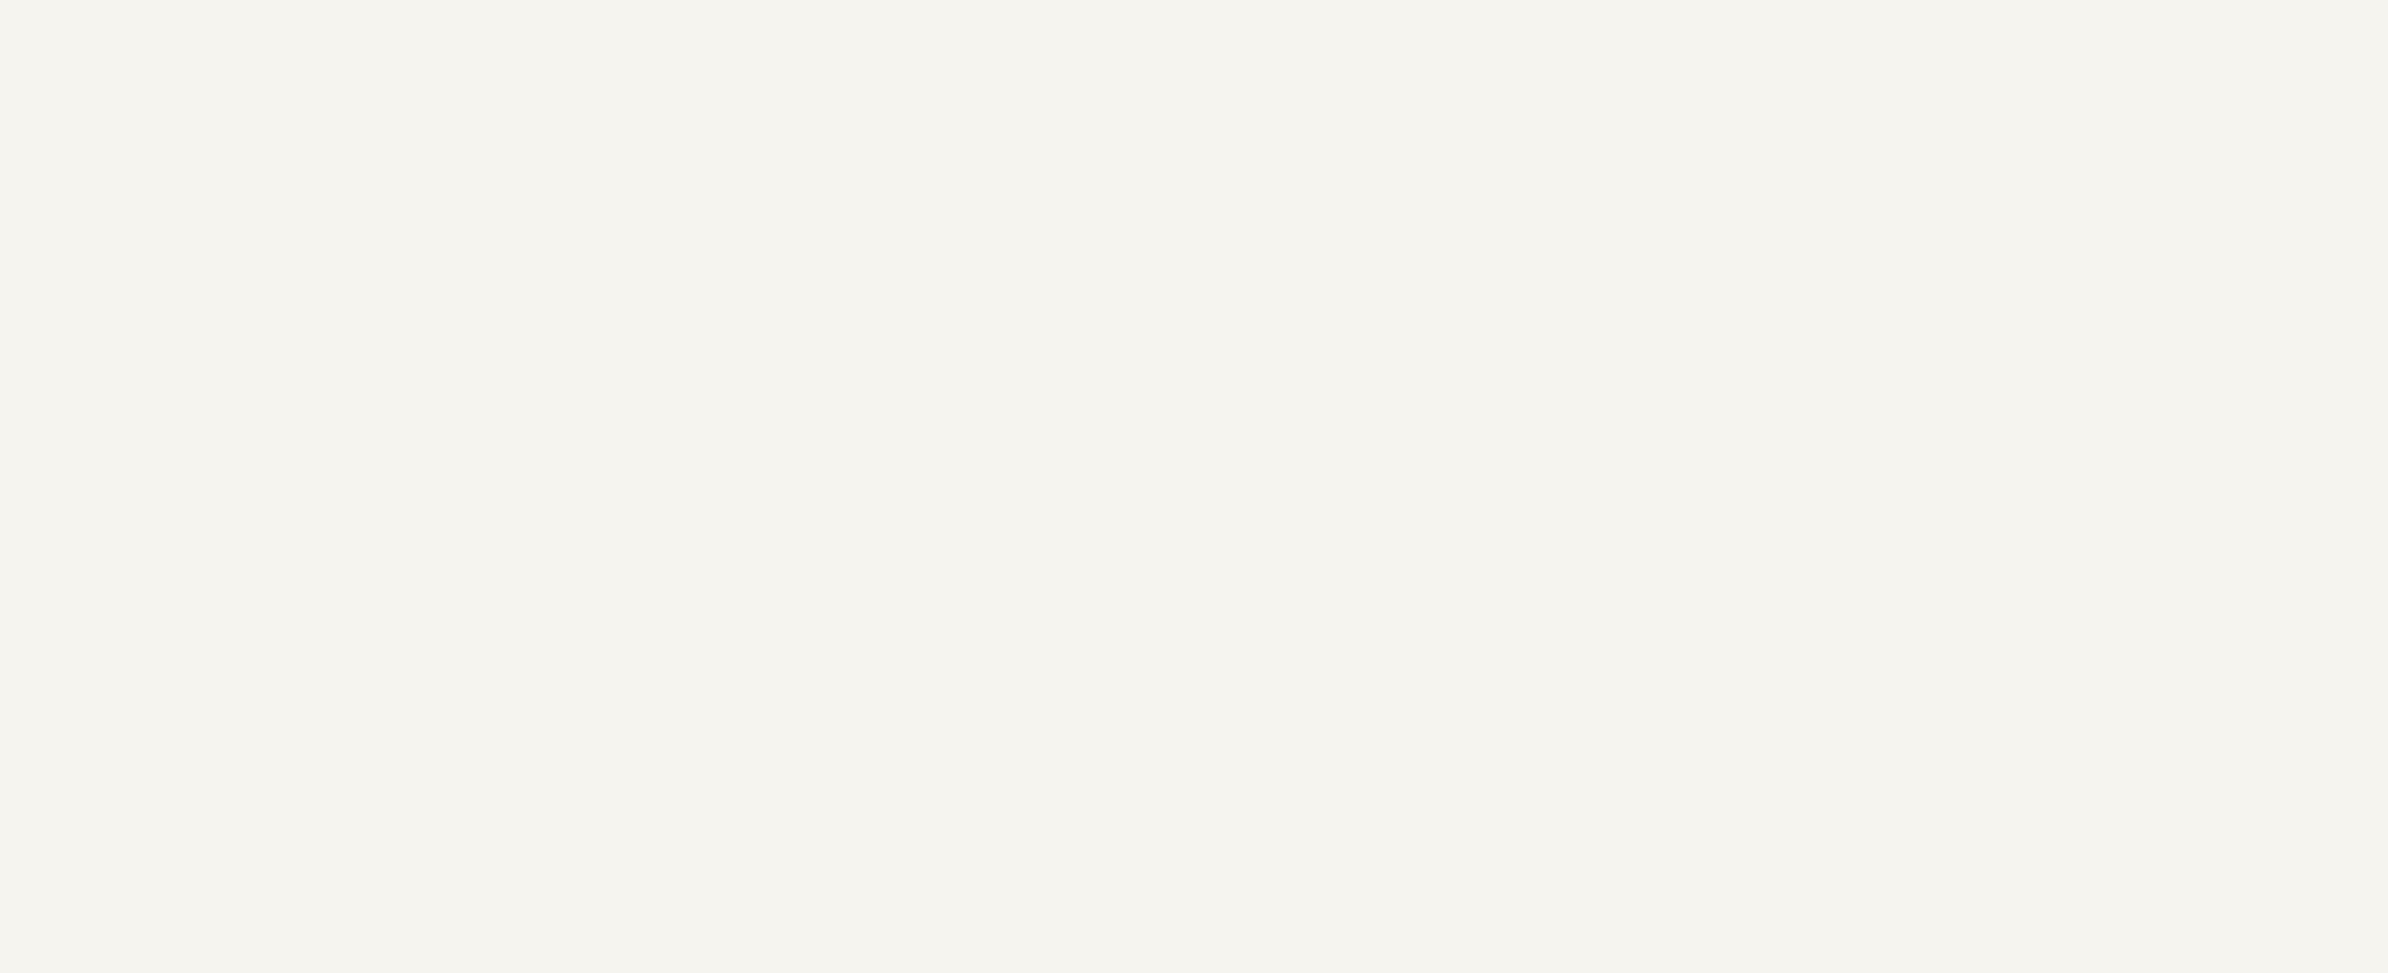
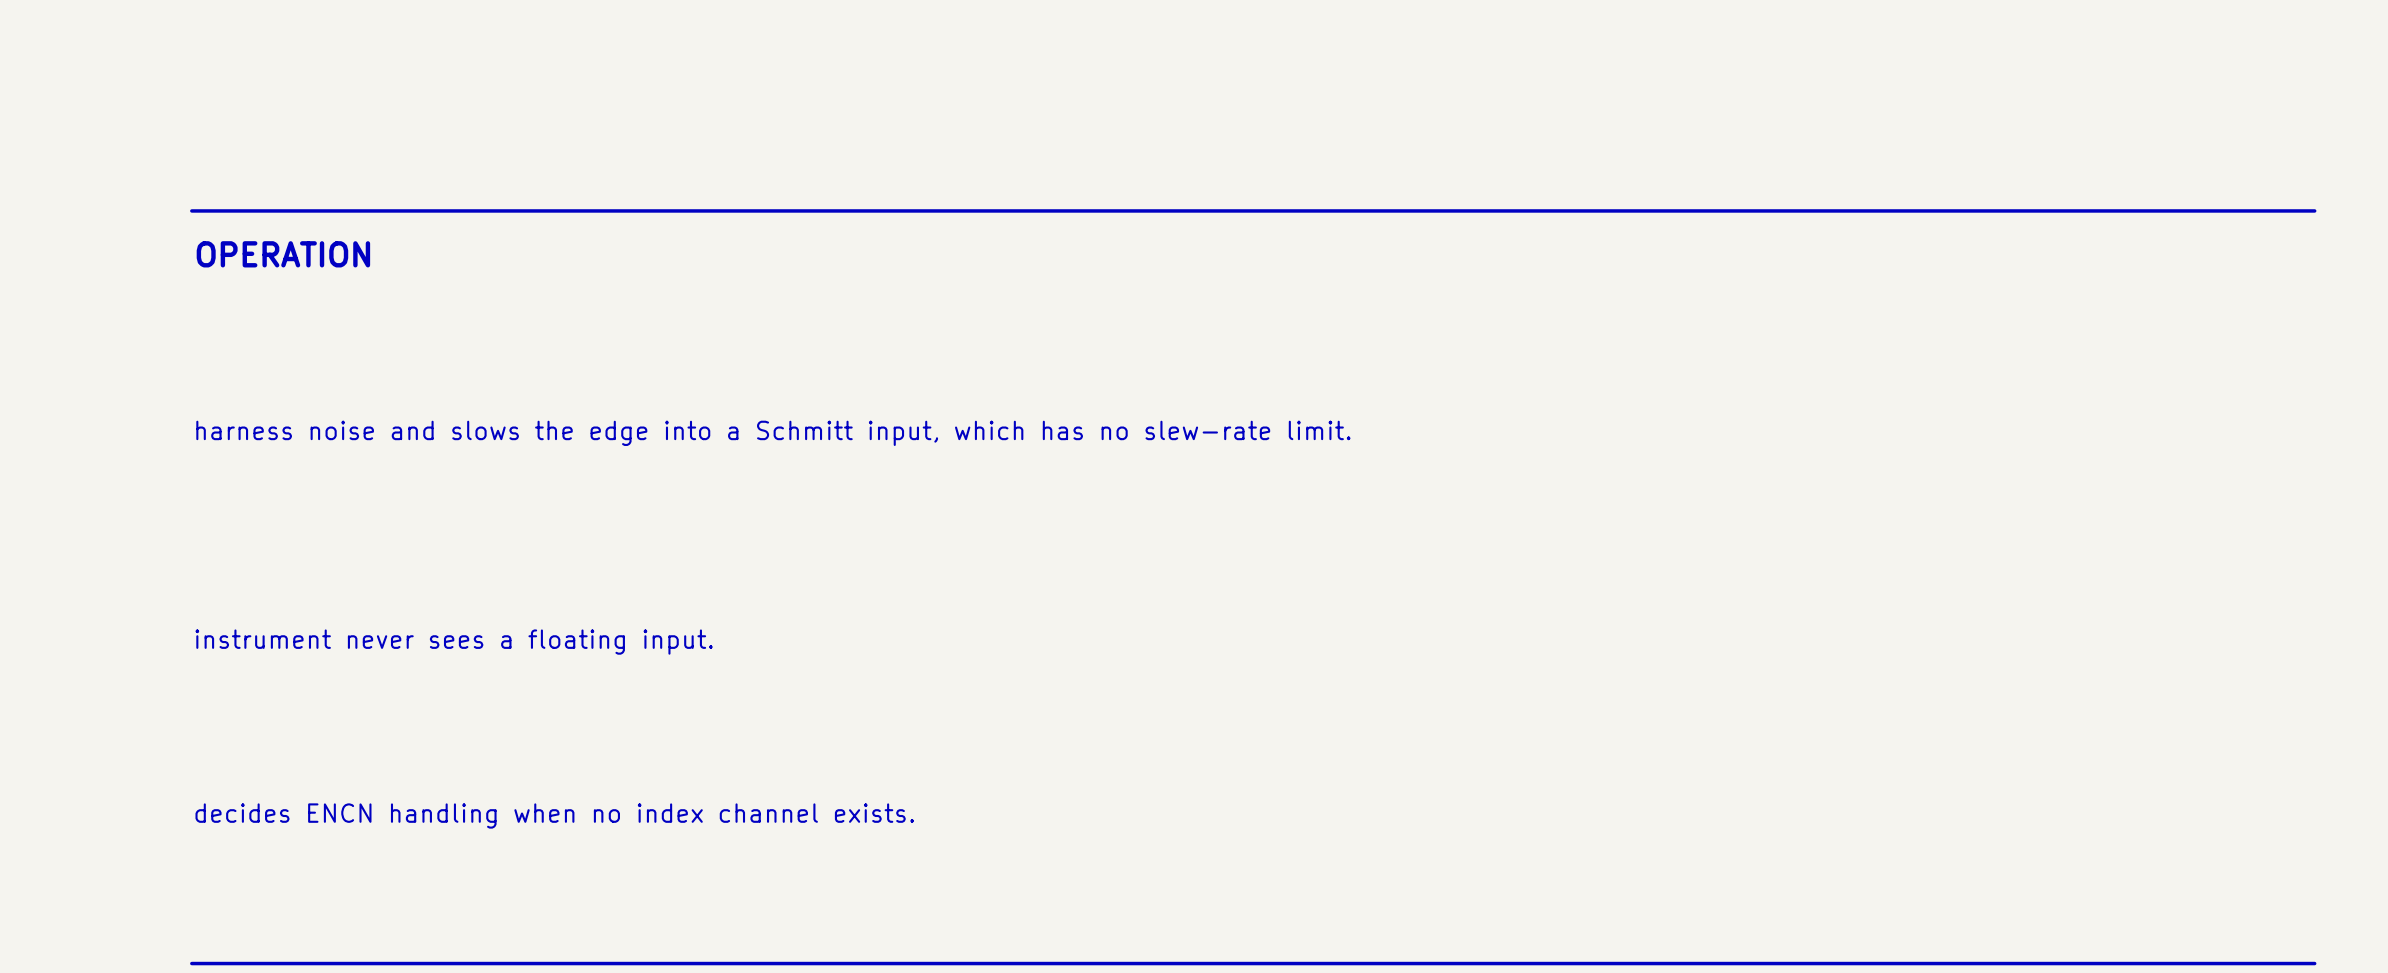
line: none -> (191, 210) (2314, 210)
text: none -> OPERATION (283, 254)
text: none -> harness noise and slows the edge into a Schmitt input, which has no slew-rate limit. (773, 433)
text: none -> instrument never sees a floating input. (454, 642)
text: none -> decides ENCN handling when no index channel exists. (554, 816)
line: none -> (191, 963) (2314, 963)

